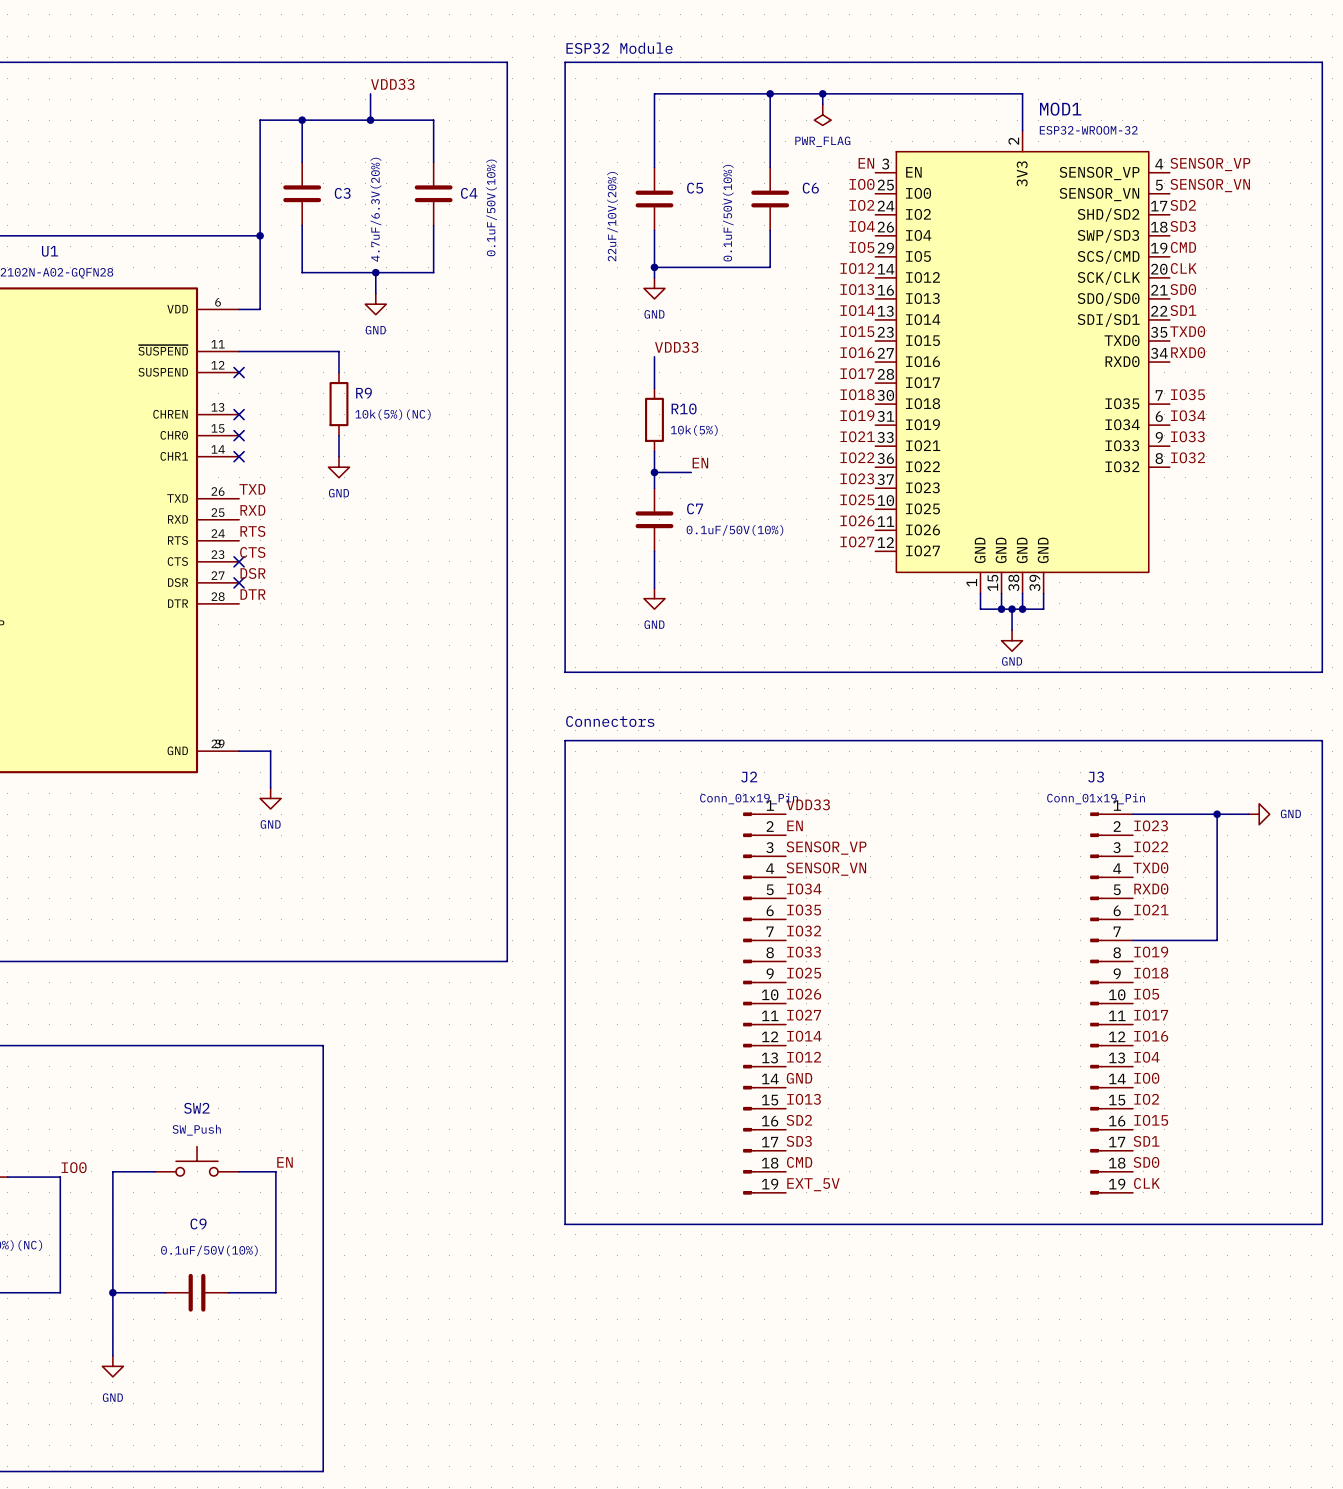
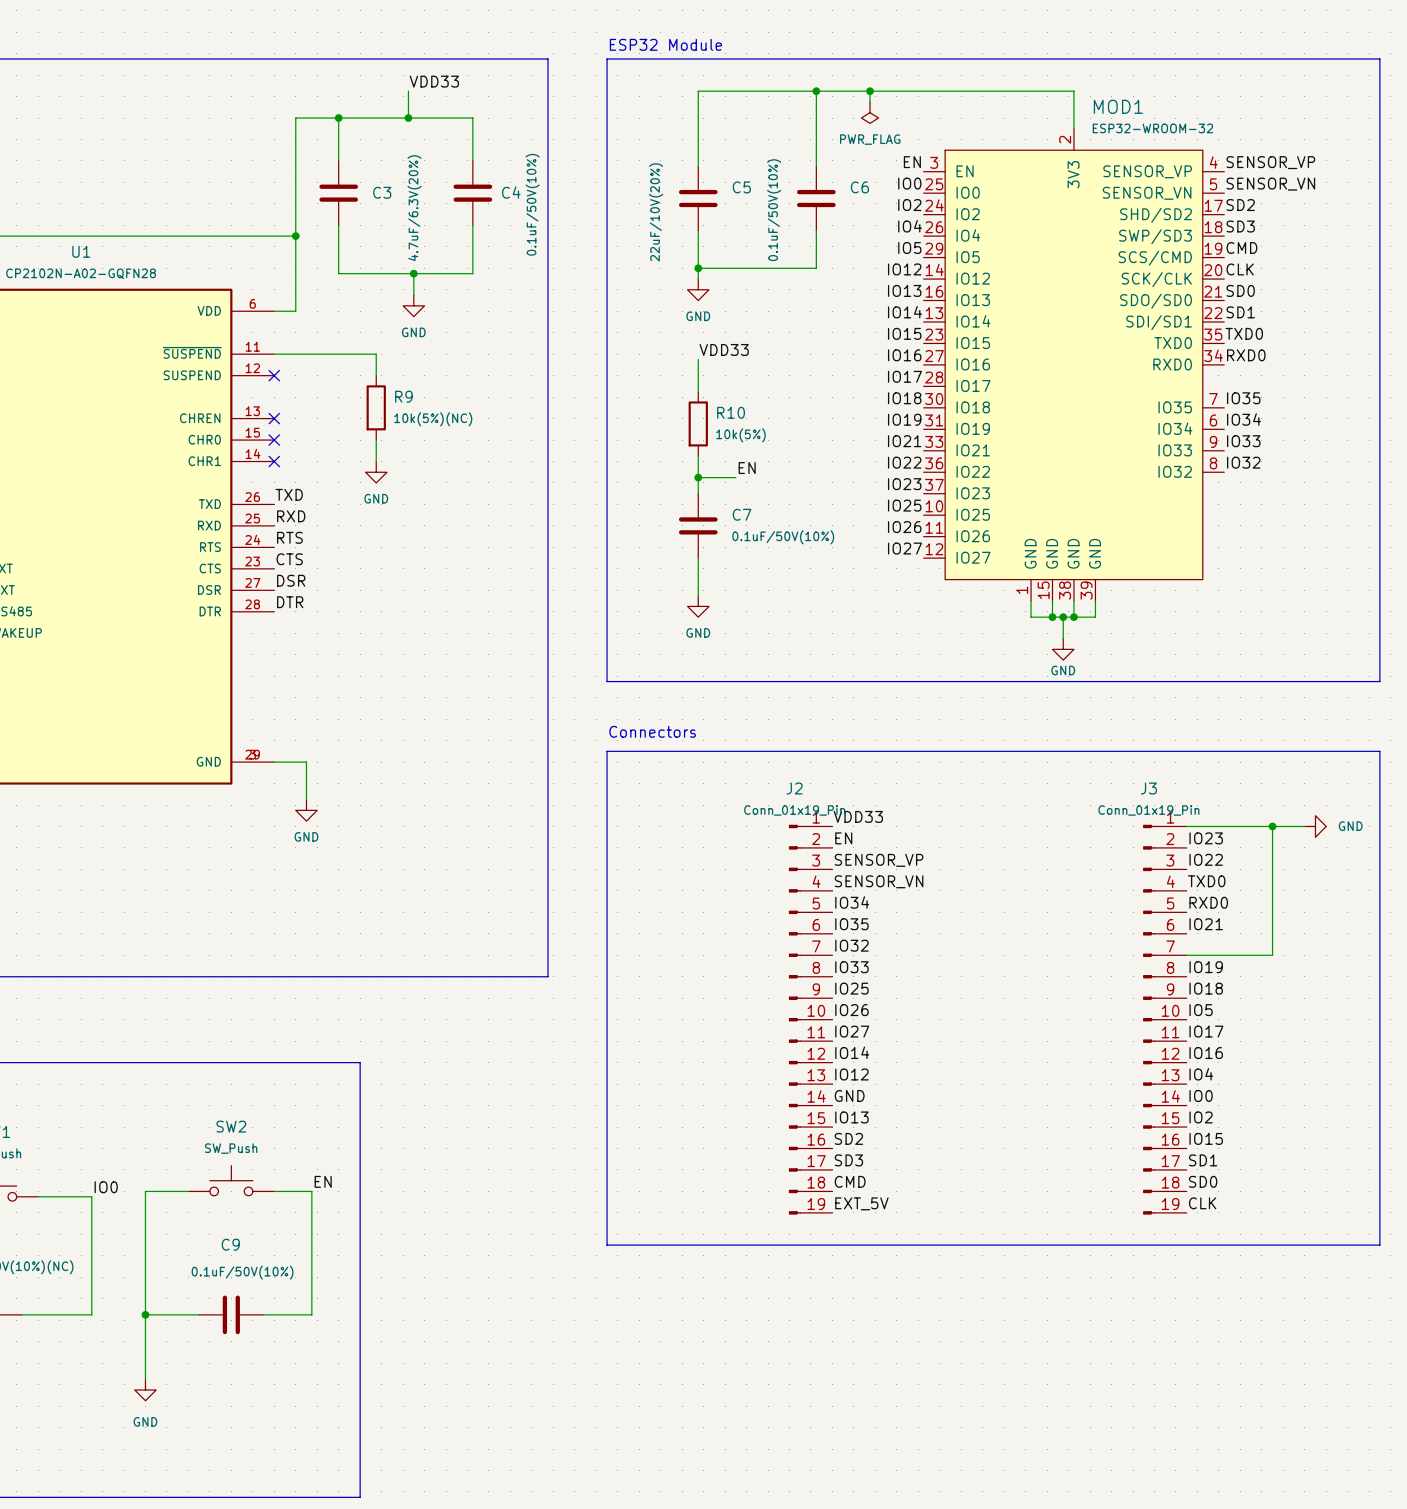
no-connect mark: (239, 561) -> none
no-connect mark: (239, 582) -> none

